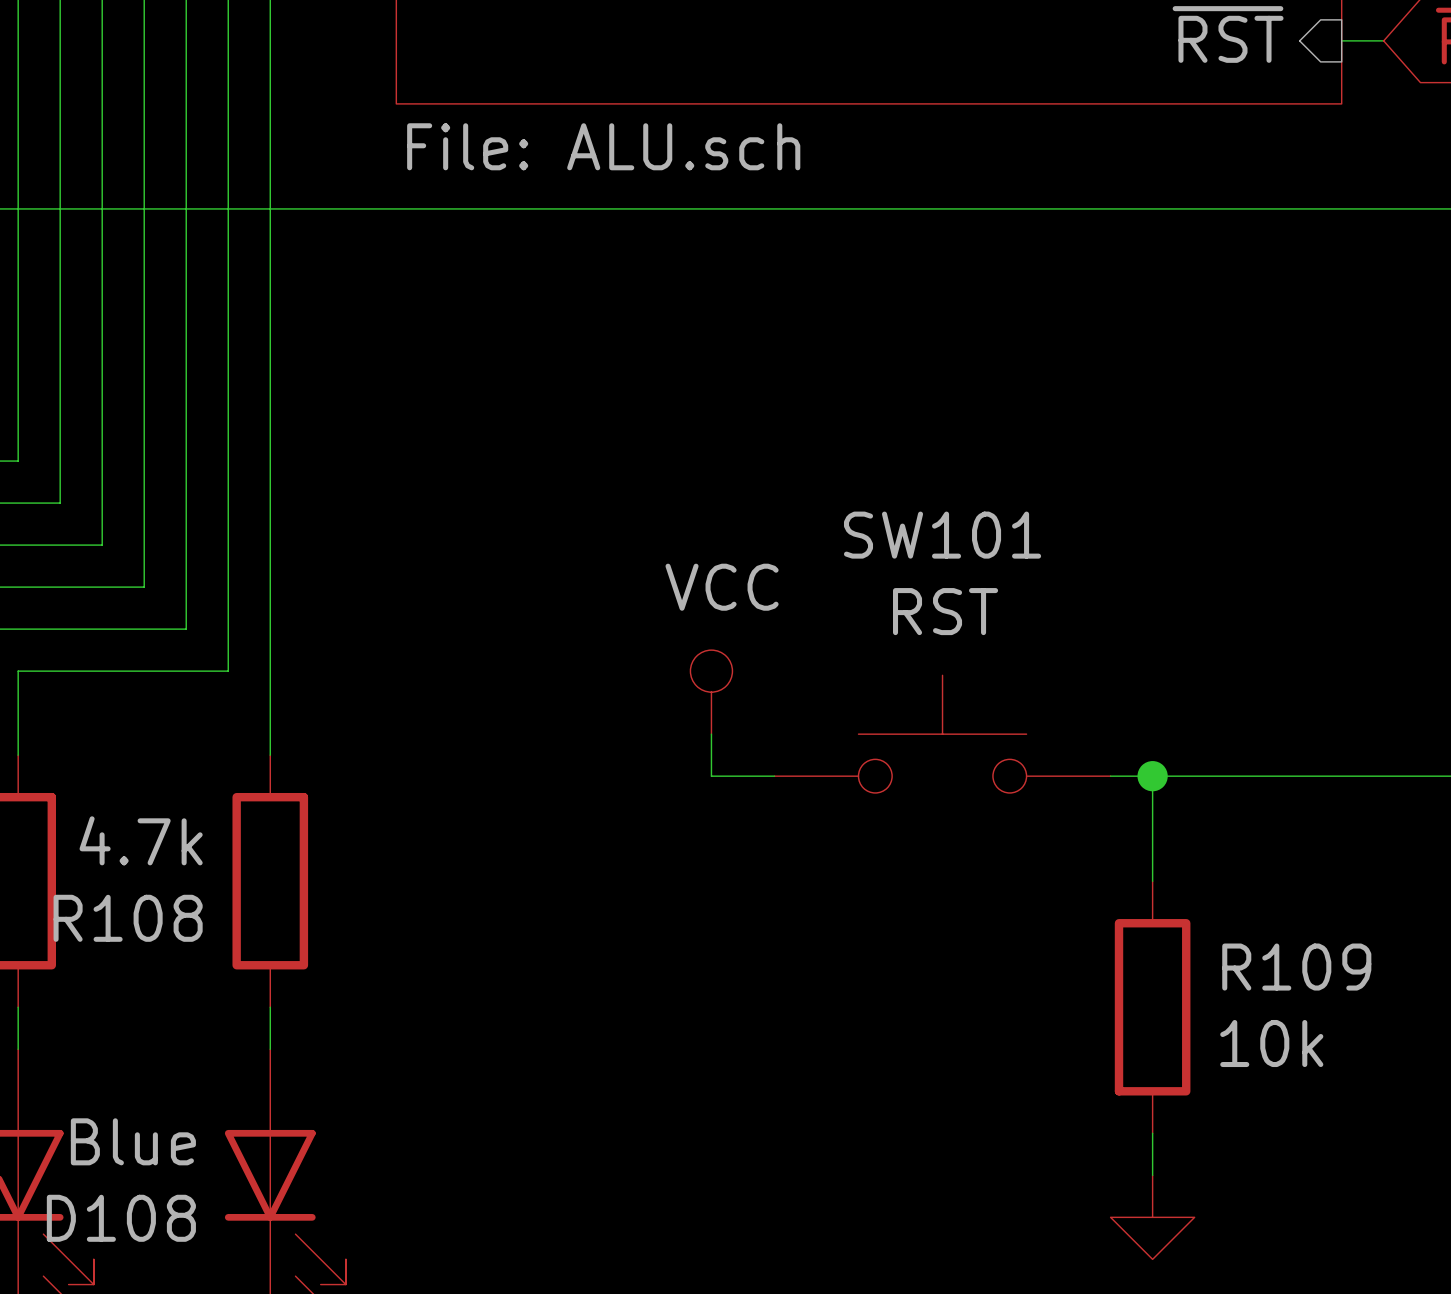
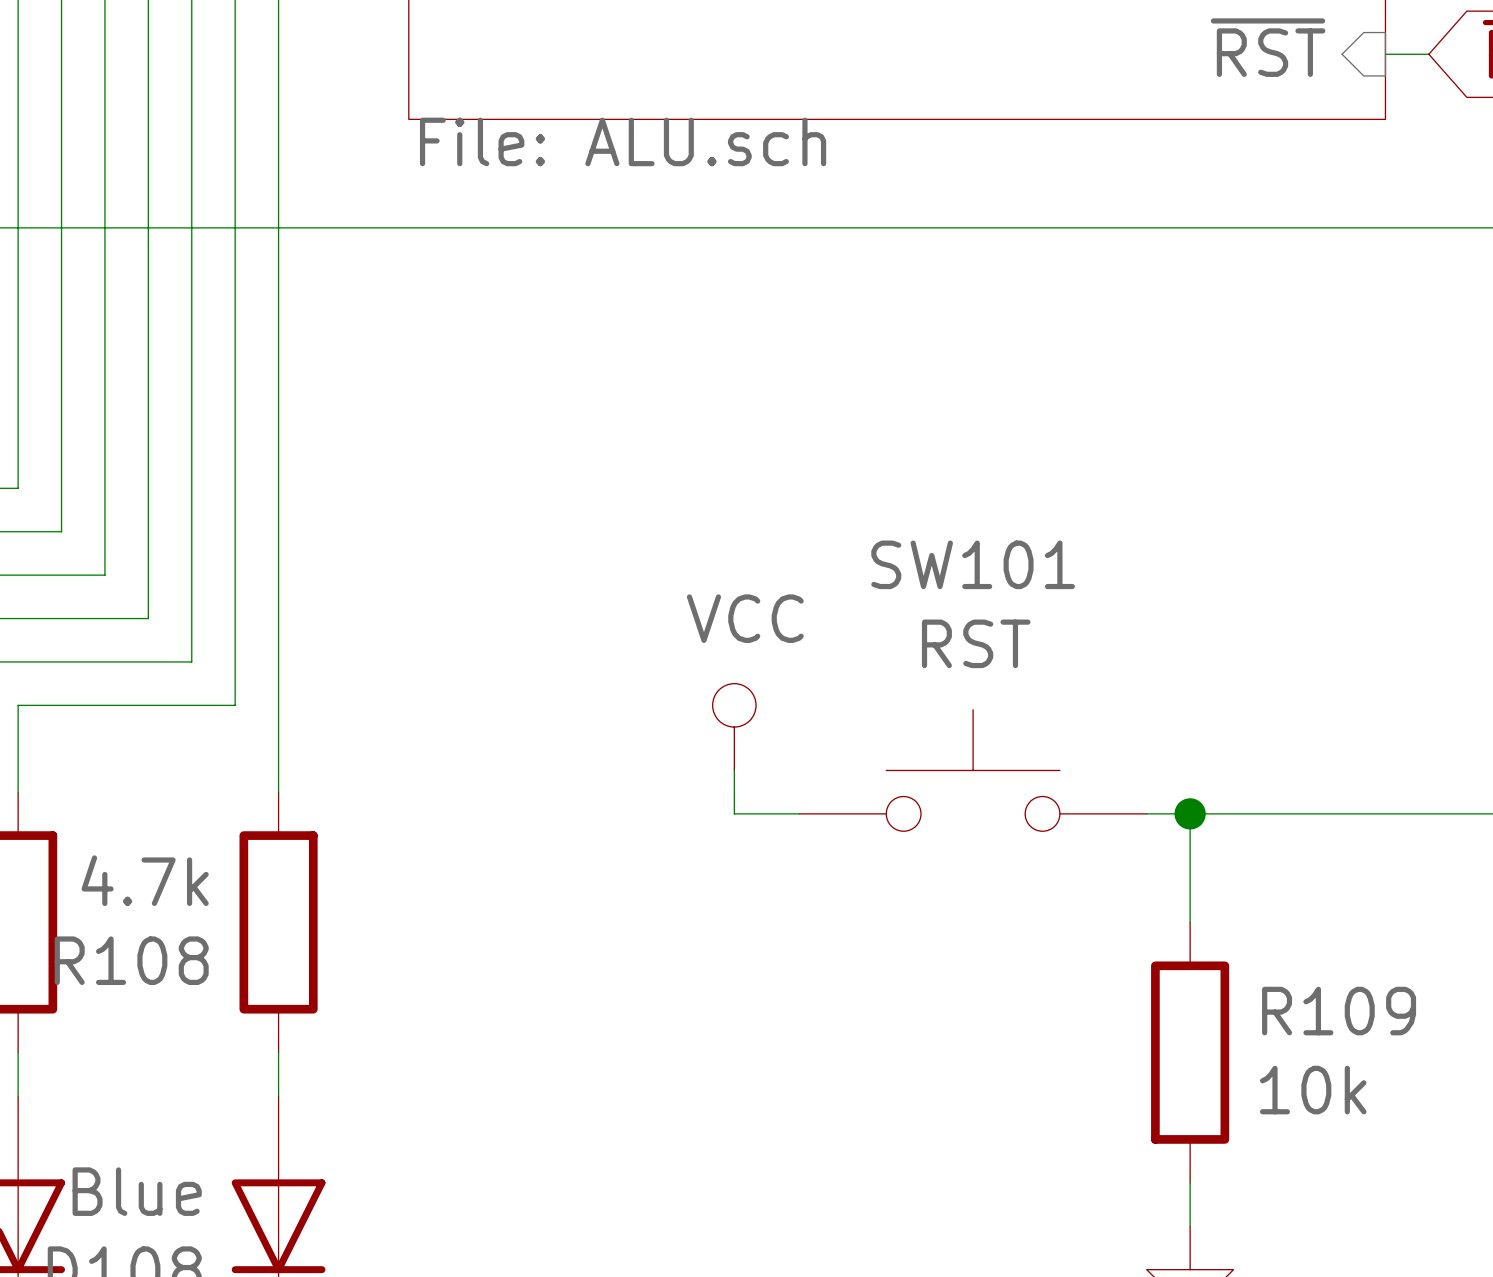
sheet value position: File: ALU.sch (603, 146) -> File: ALU.sch (623, 141)

